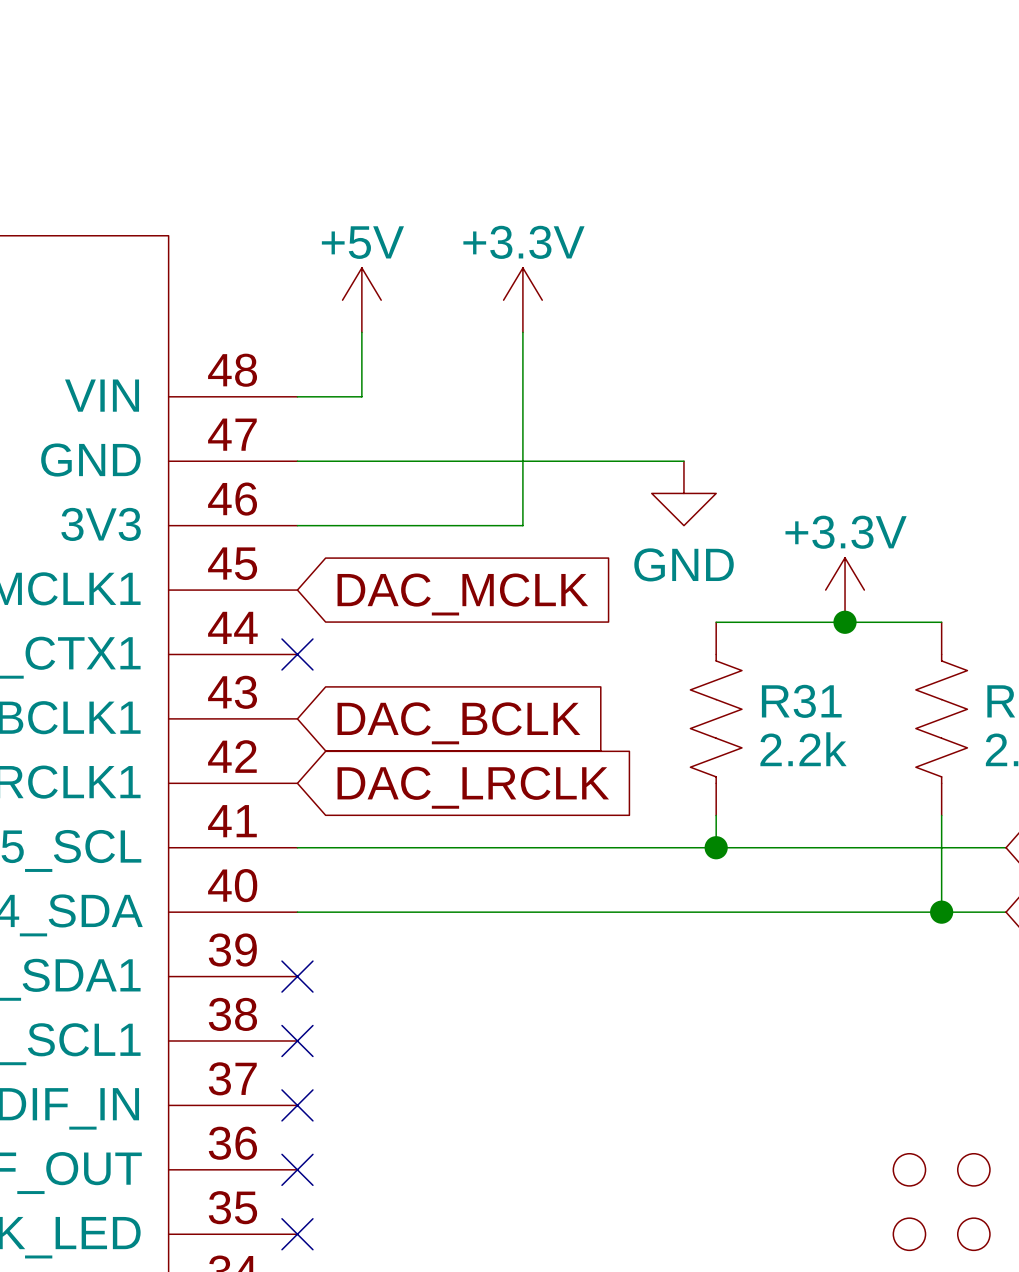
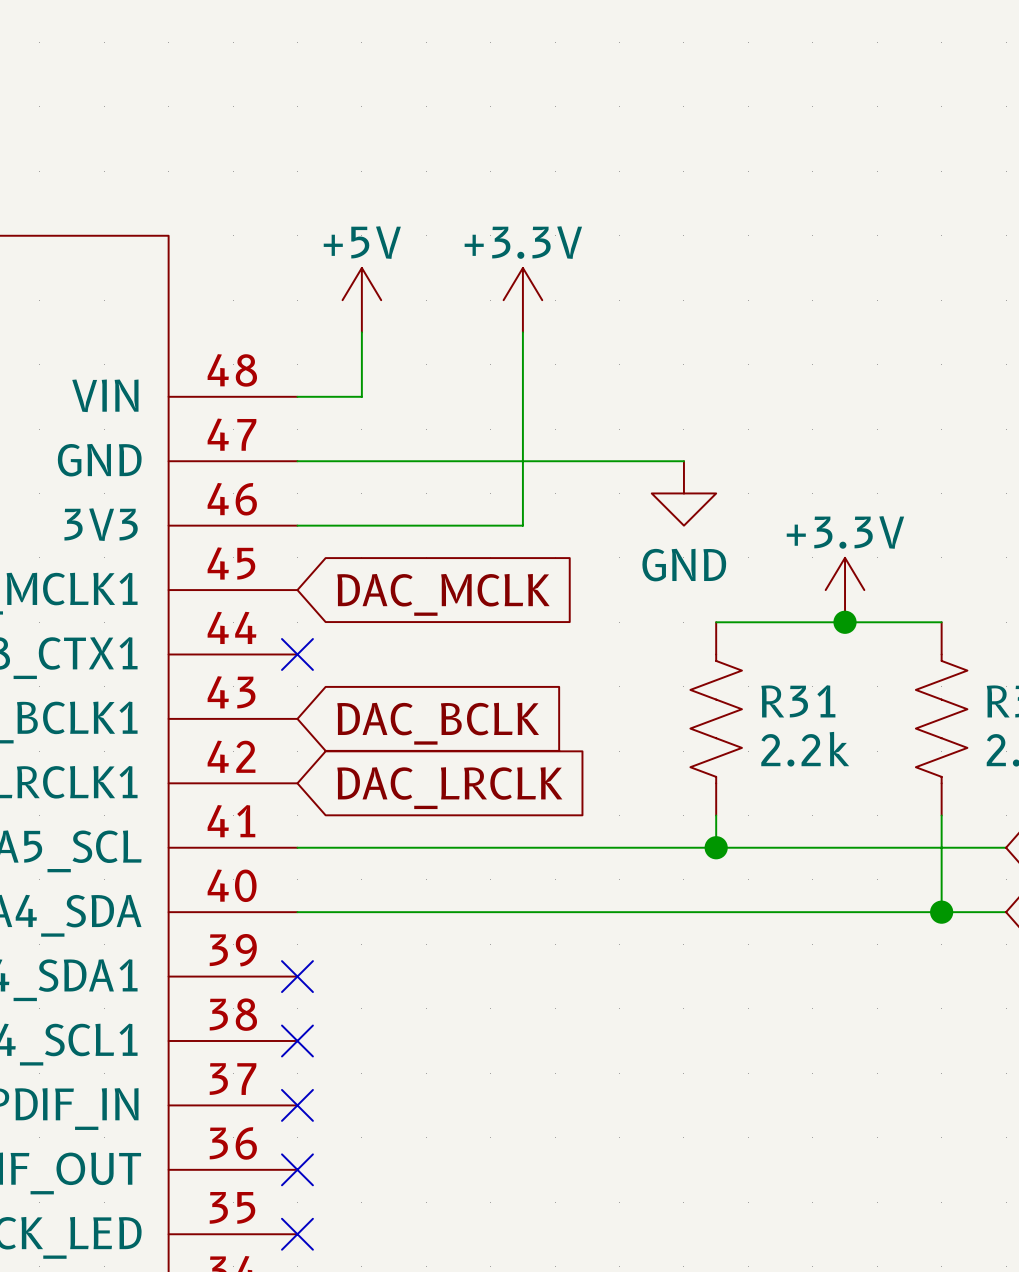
part: (909, 1169) -> none
part: (973, 1169) -> none
part: (909, 1234) -> none
part: (973, 1234) -> none

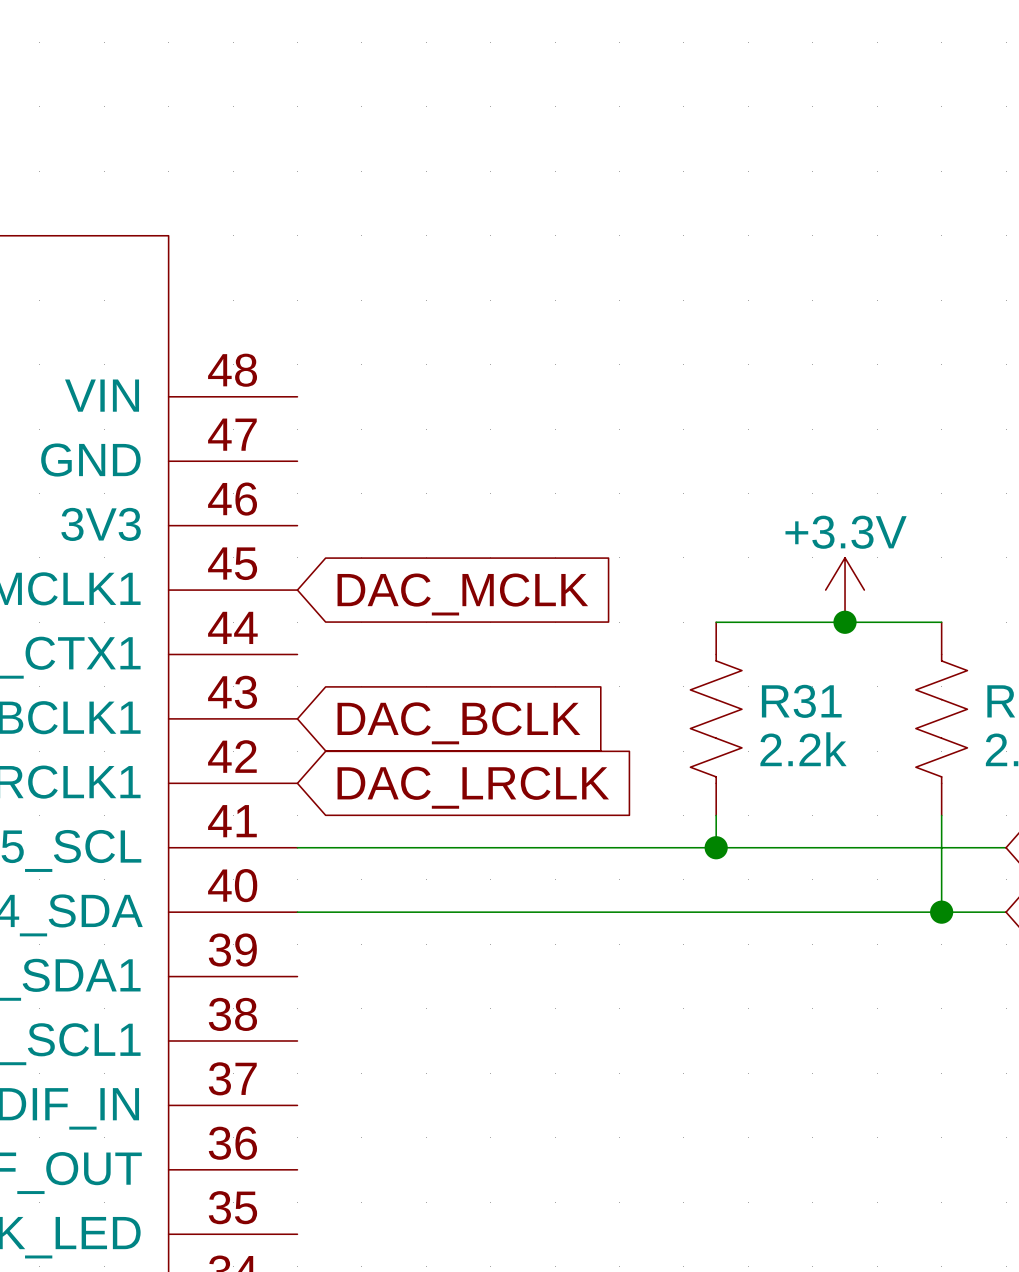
power symbol: +5V (361, 300) -> none
power symbol: +3.3V (522, 300) -> none
wire: (361, 332) (361, 396) (297, 396) -> none
wire: (522, 332) (522, 525) (297, 525) -> none
wire: (297, 461) (683, 461) -> none
power symbol: GND (683, 493) -> none
no-connect mark: (297, 654) -> none
no-connect mark: (297, 976) -> none
no-connect mark: (297, 1040) -> none
no-connect mark: (297, 1105) -> none
no-connect mark: (297, 1169) -> none
no-connect mark: (297, 1234) -> none

